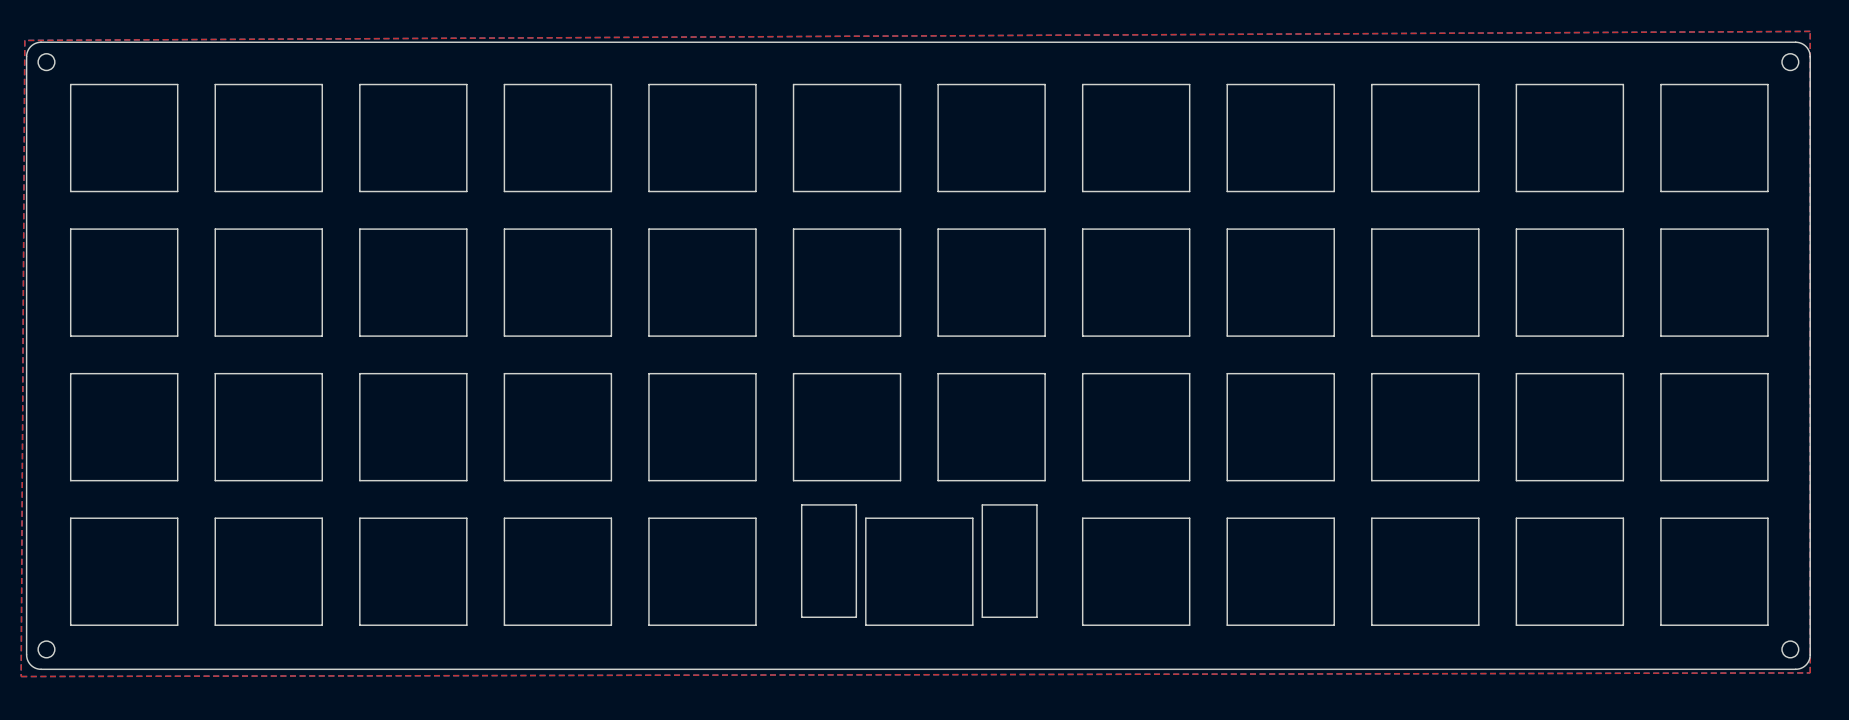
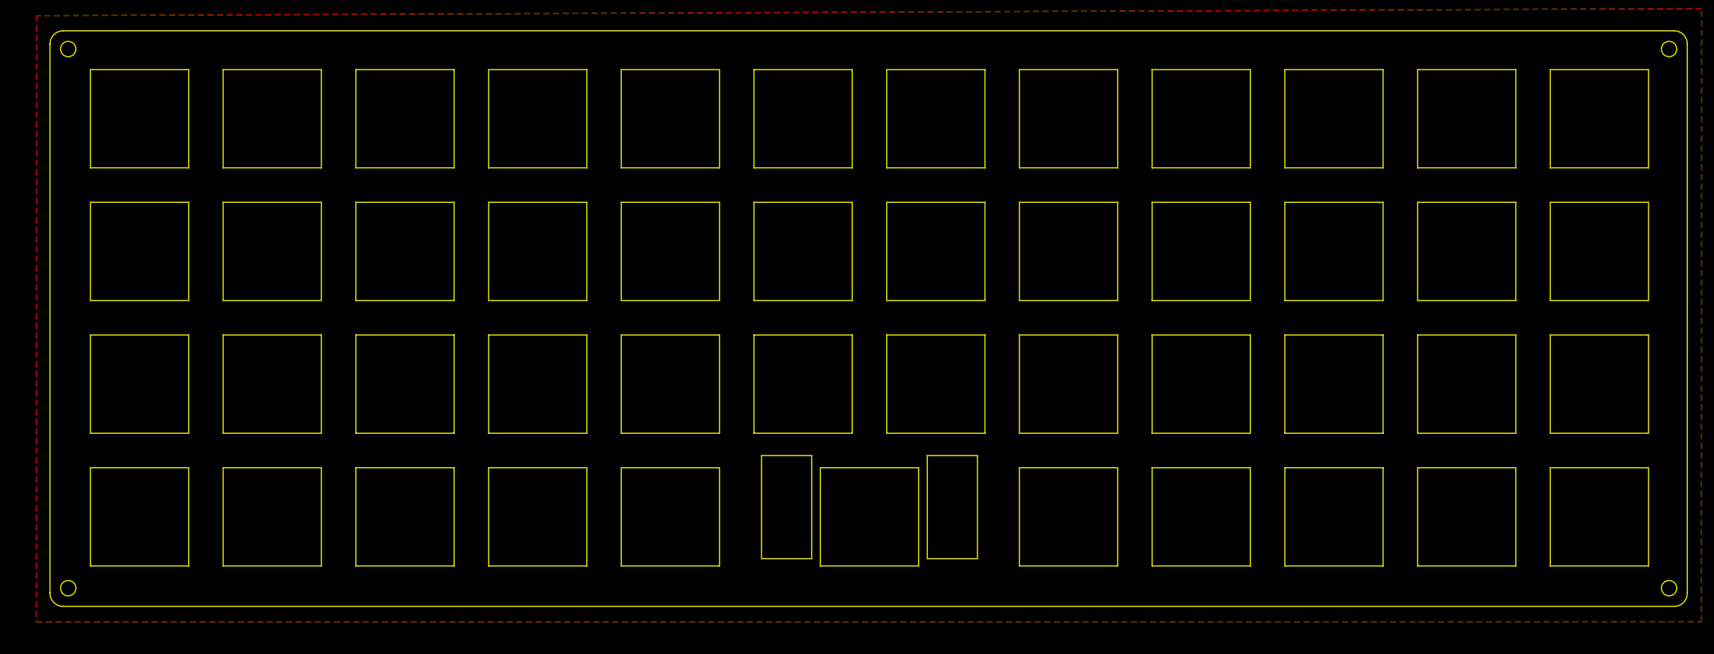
top zone outline: (1810, 31) (1810, 672) (21, 676) (24, 40) (1810, 31) -> (1701, 8) (36, 15) (36, 621) (1701, 621) (1701, 8)

